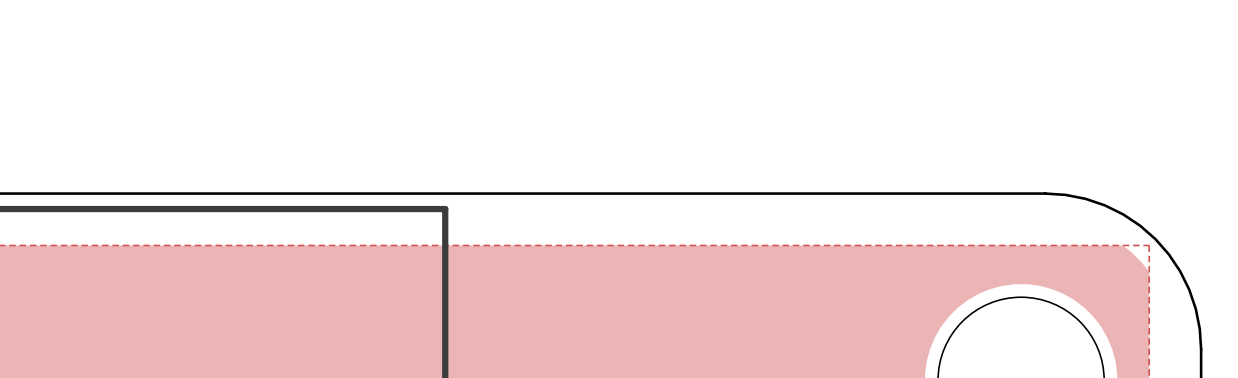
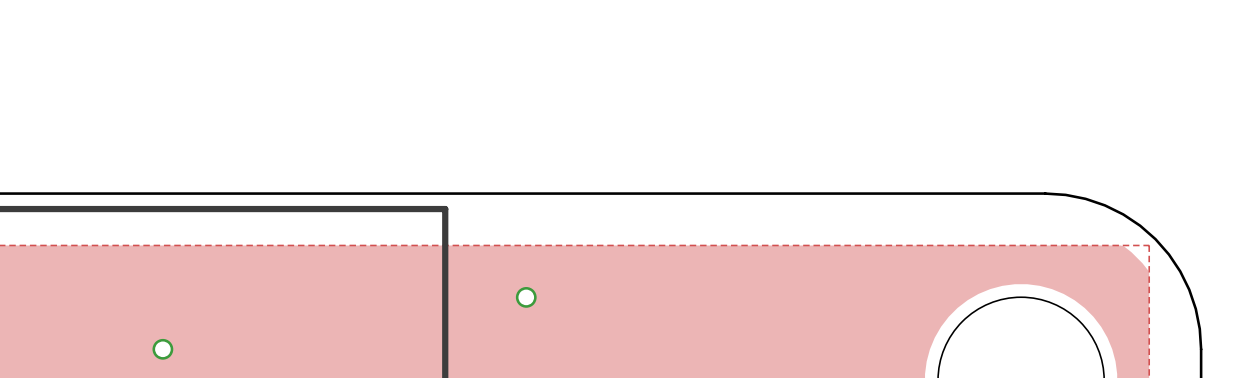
via: none -> (526, 297)
via: none -> (162, 349)

